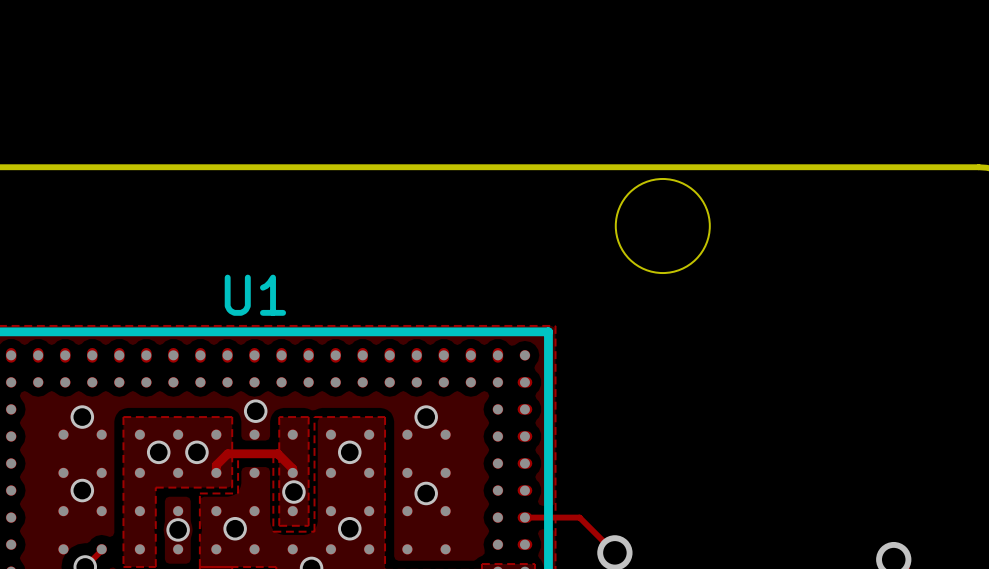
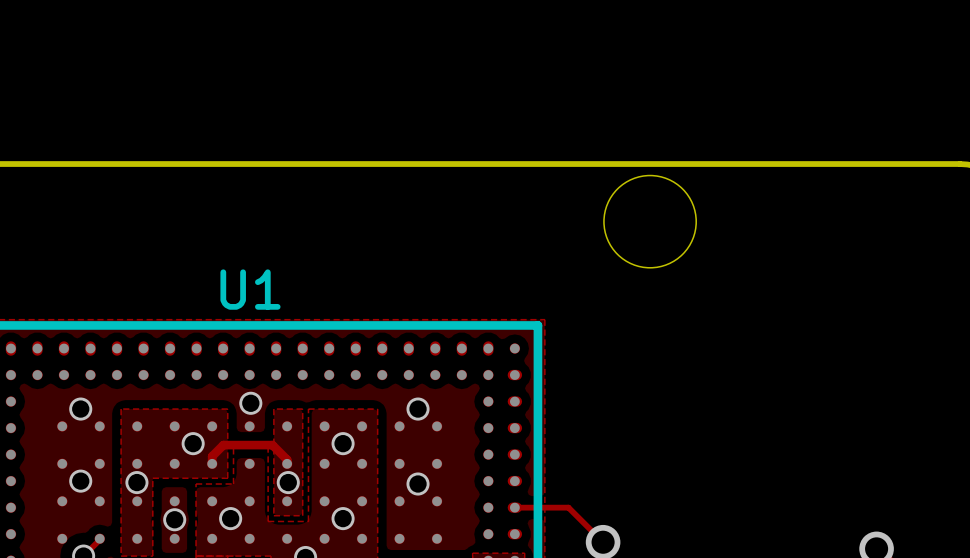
via position: (158, 452) -> (136, 482)

